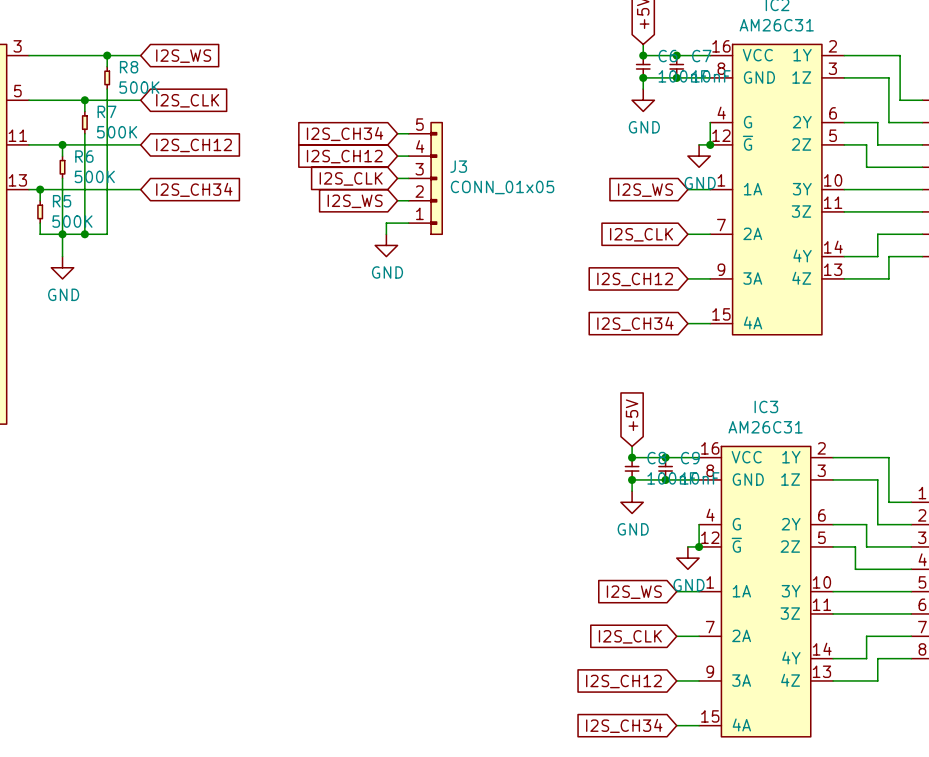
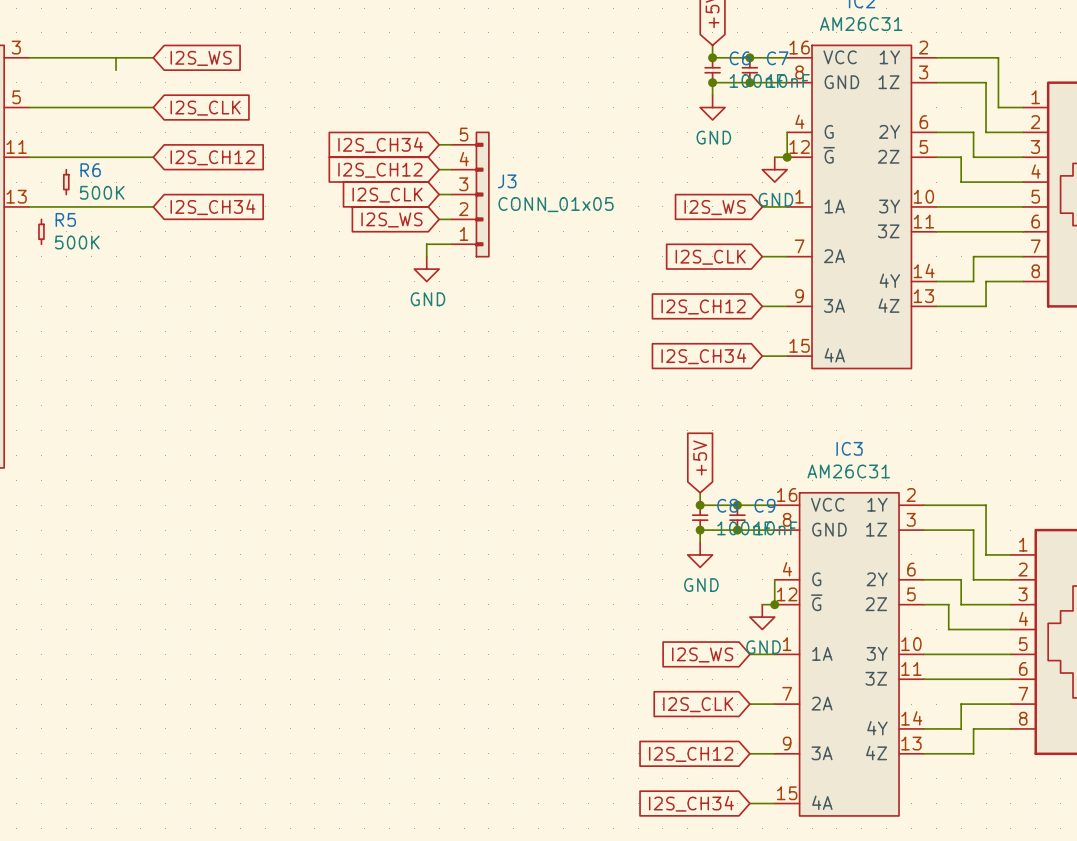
junction: (107, 55) -> none
R8: 500K (107, 77) -> none
wire: (107, 89) (107, 234) (40, 234) (40, 223) -> none
wire: (84, 100) (84, 111) -> none
junction: (84, 100) -> none
R7: 500K (84, 122) -> none
wire: (84, 133) (84, 234) -> none
wire: (62, 144) (62, 156) -> none
junction: (62, 144) -> none
wire: (62, 178) (62, 256) -> none
wire: (40, 189) (40, 200) -> none
junction: (40, 189) -> none
junction: (62, 234) -> none
junction: (84, 234) -> none
power symbol: GND (62, 267) -> none

